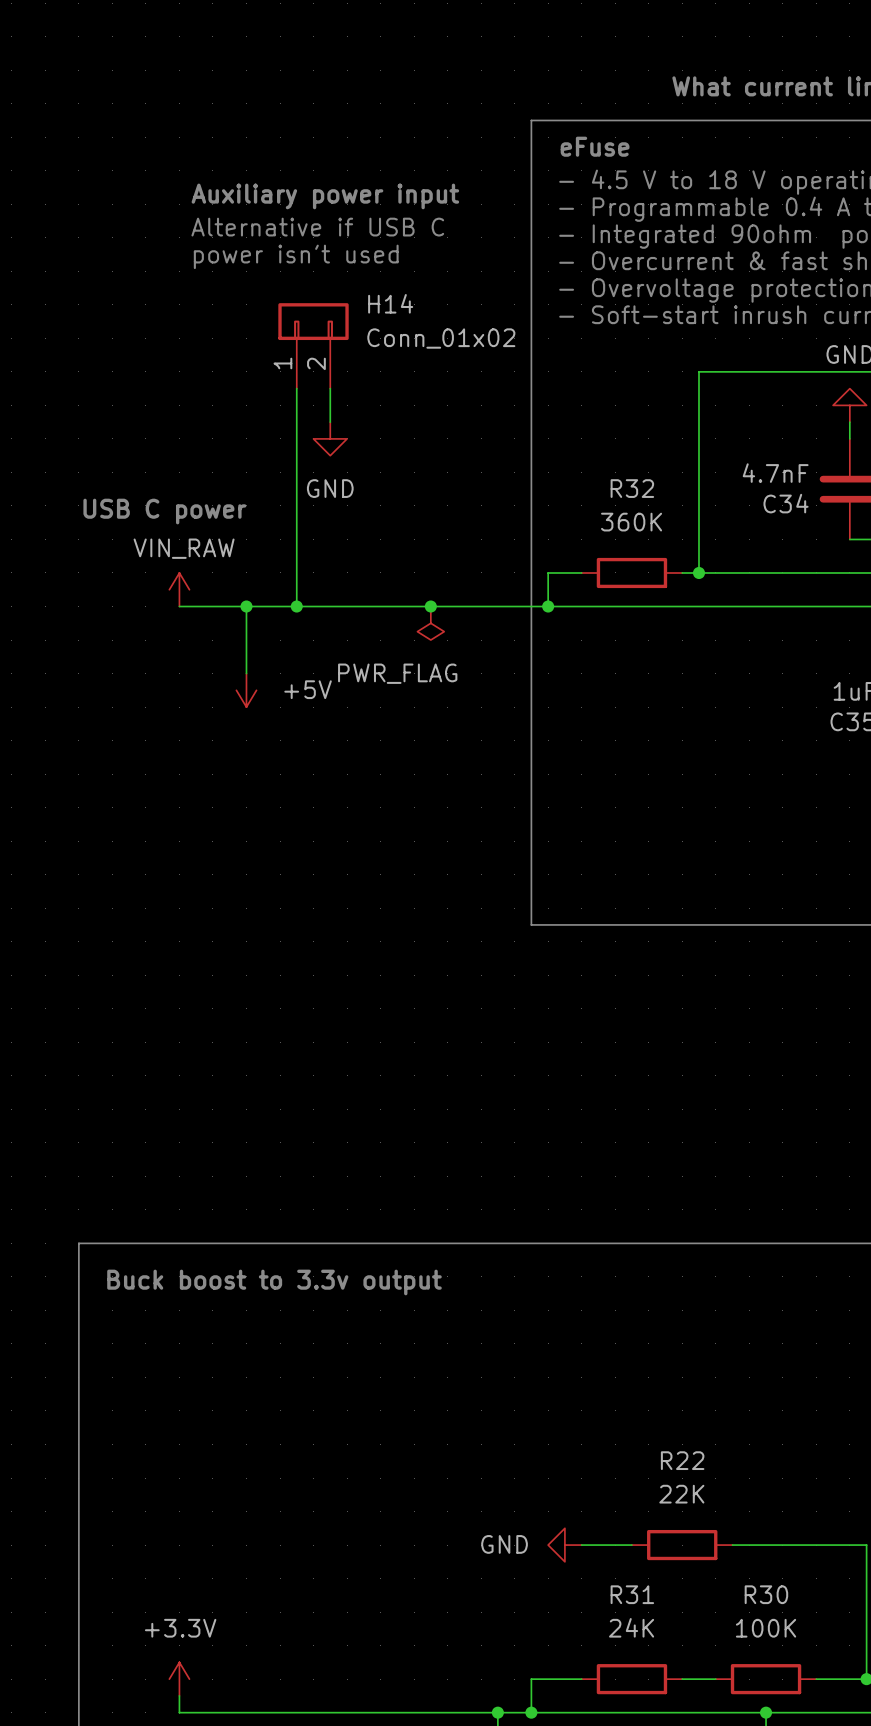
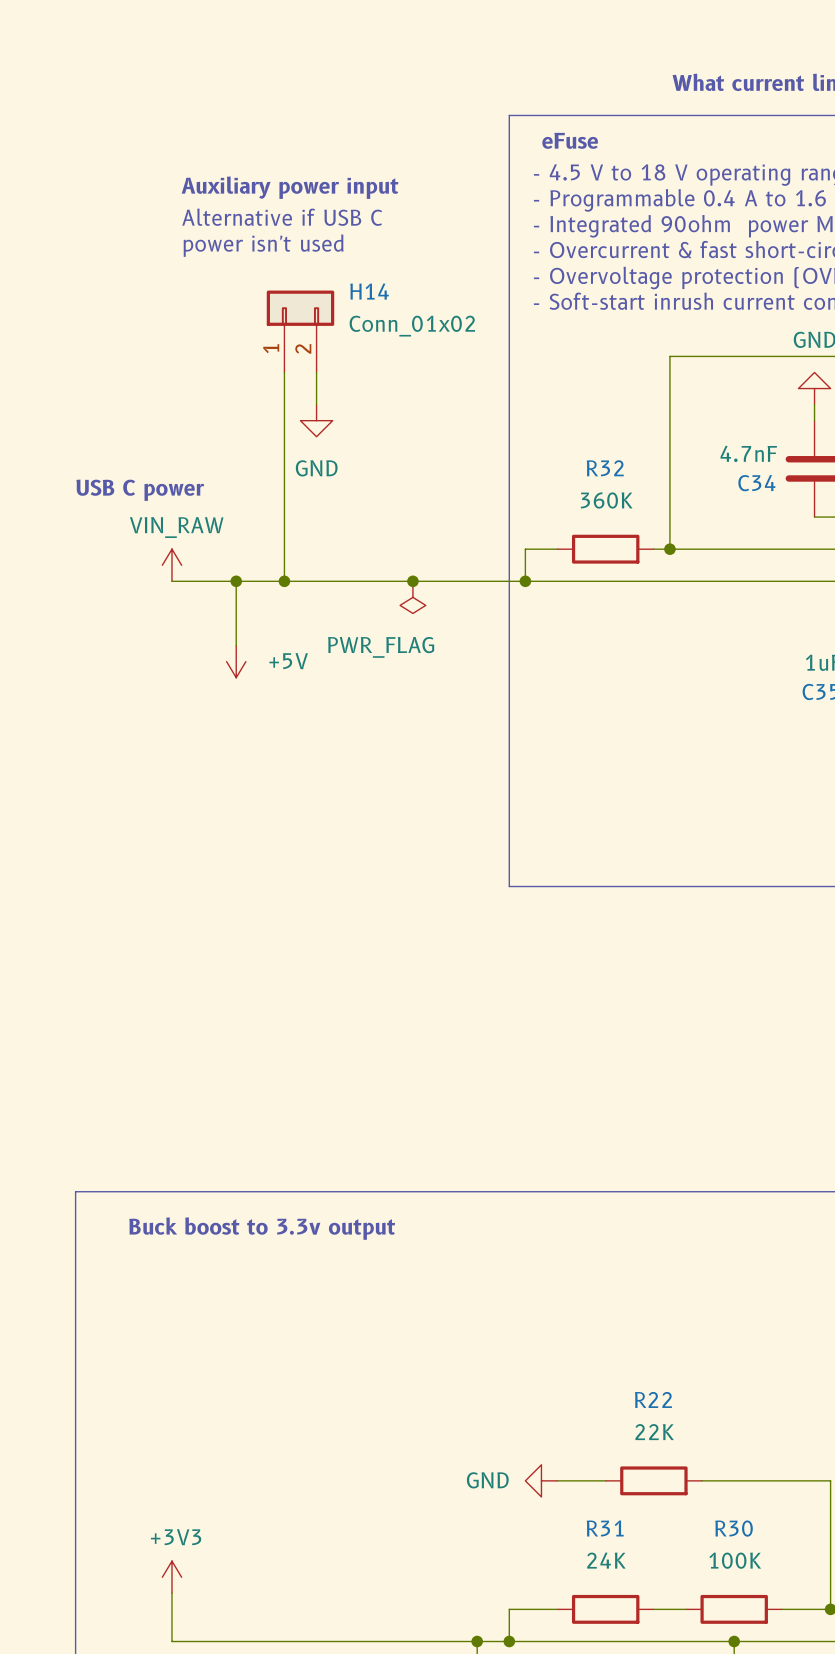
power symbol: none -> +3V3 (171, 1577)
power symbol: +3.3V (179, 1679) -> none

